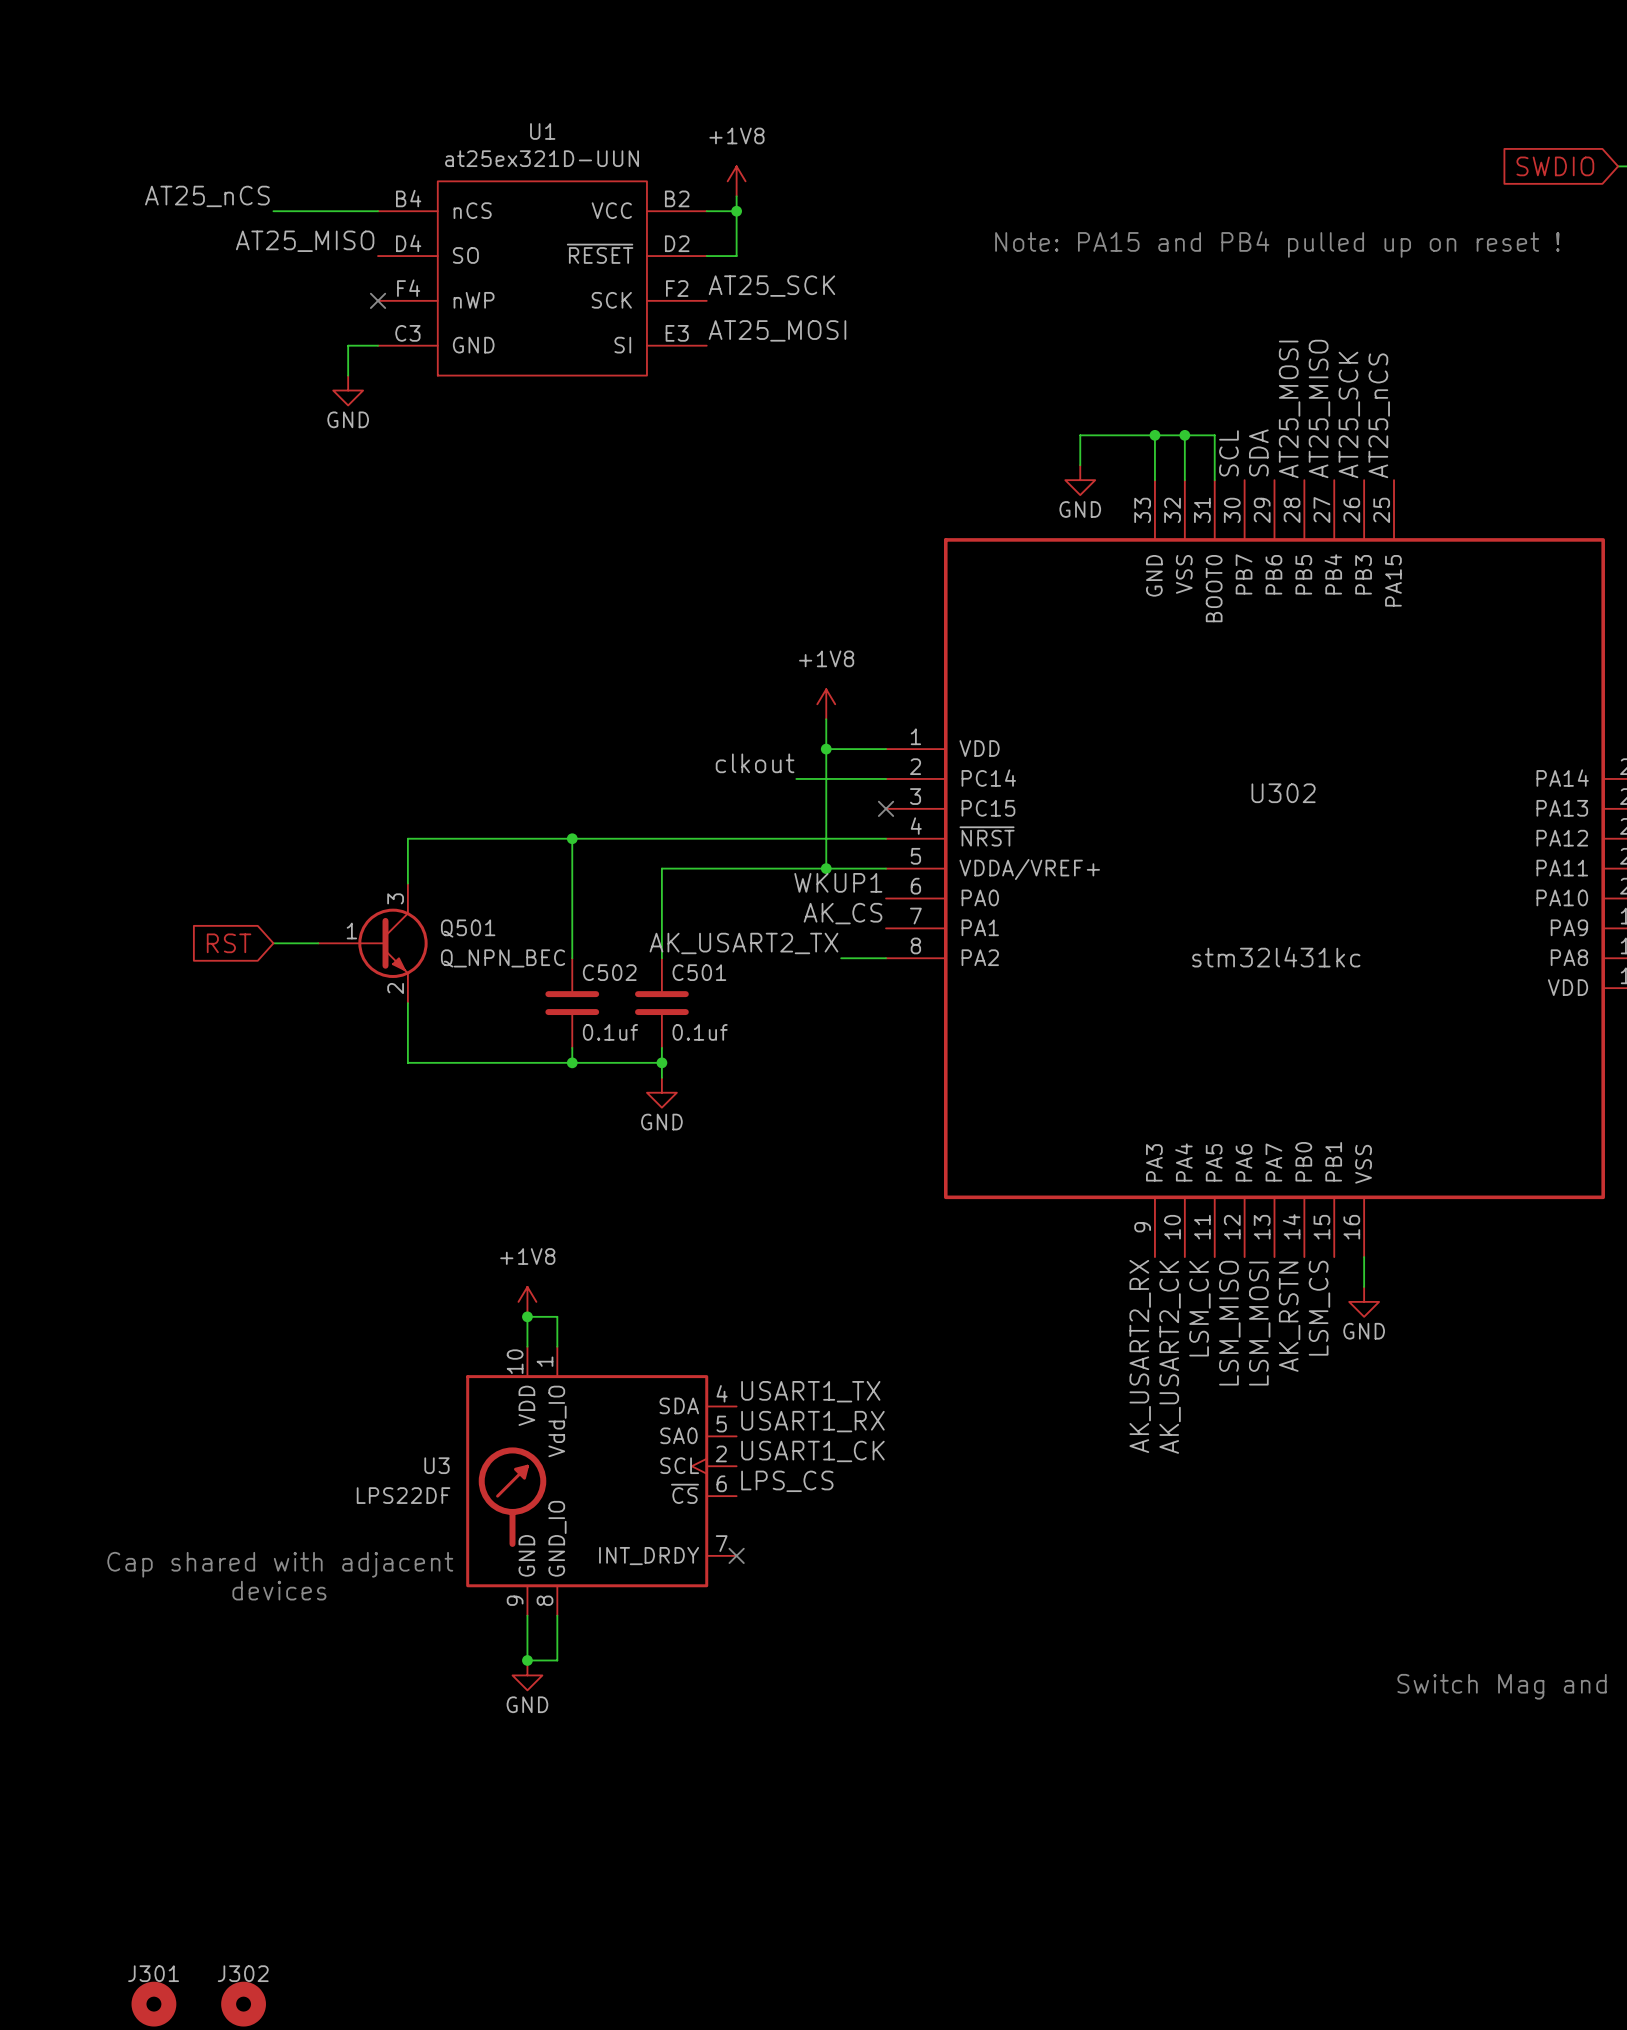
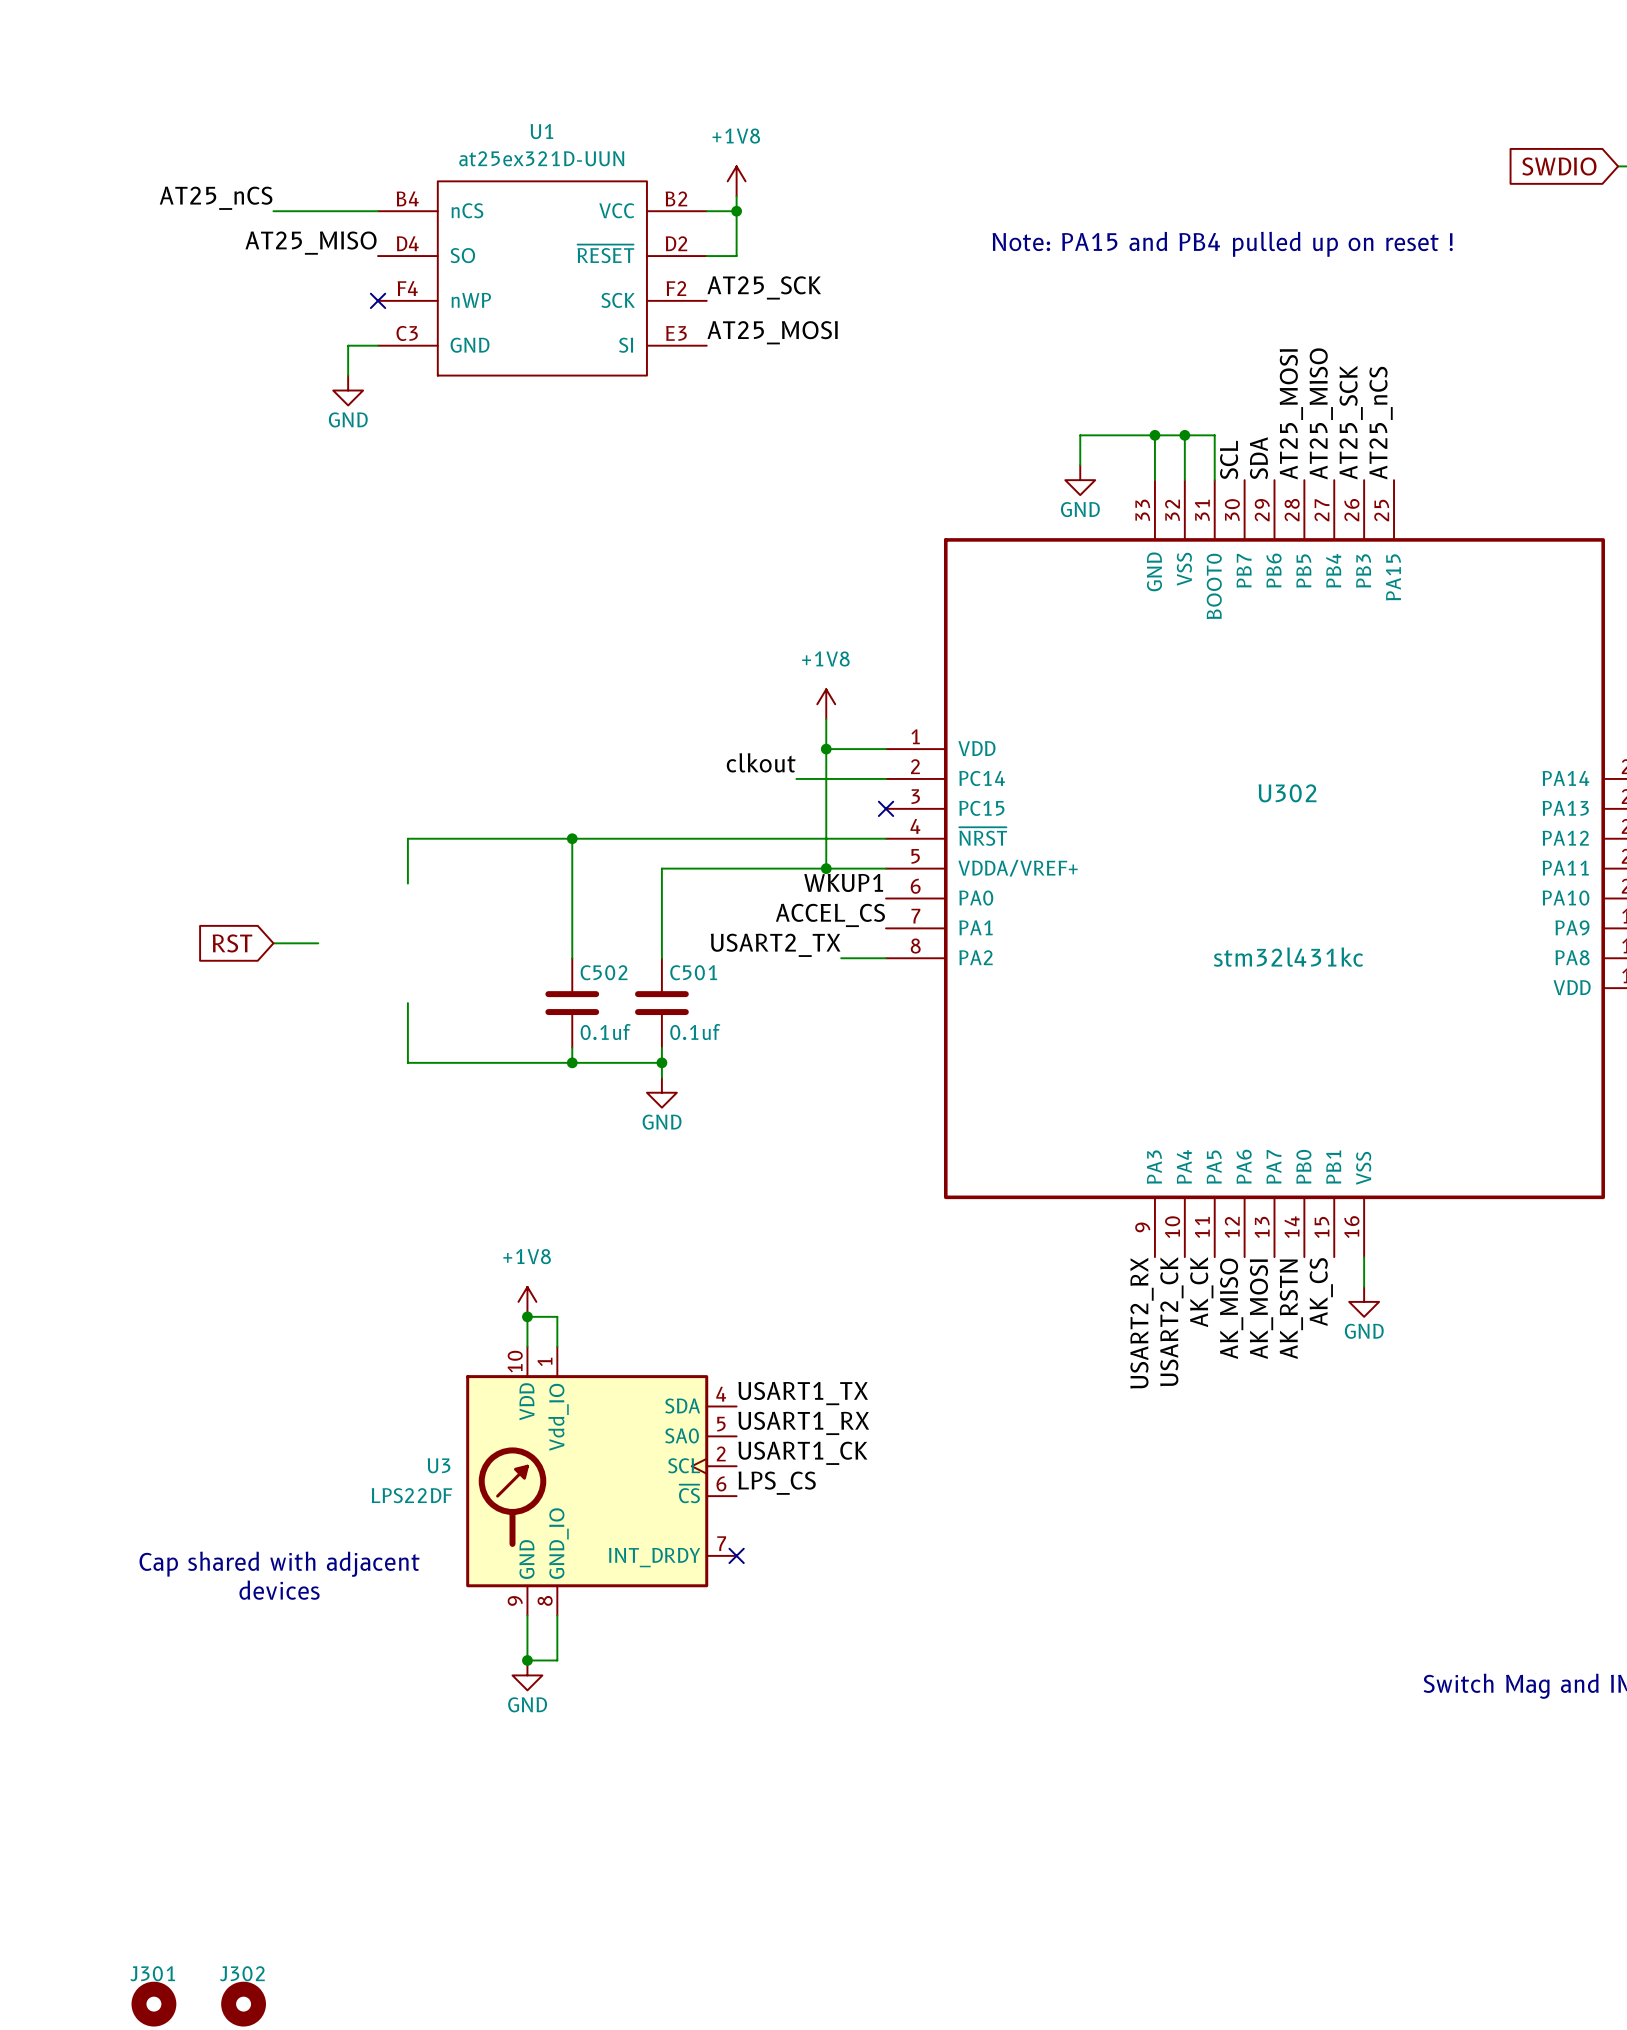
label: AK_CS (843, 913) -> ACCEL_CS (830, 915)
Q501: Q_NPN_BEC (372, 943) -> none
label: AK_USART2_TX (743, 943) -> USART2_TX (775, 945)
label: LSM_CK (1199, 1308) -> AK_CK (1201, 1292)
label: LSM_CS (1319, 1308) -> AK_CS (1321, 1292)
label: LSM_MISO (1229, 1323) -> AK_MISO (1231, 1308)
label: LSM_MOSI (1259, 1323) -> AK_MOSI (1261, 1309)
label: AK_USART2_RX (1140, 1356) -> USART2_RX (1142, 1323)
label: AK_USART2_CK (1170, 1357) -> USART2_CK (1171, 1321)

